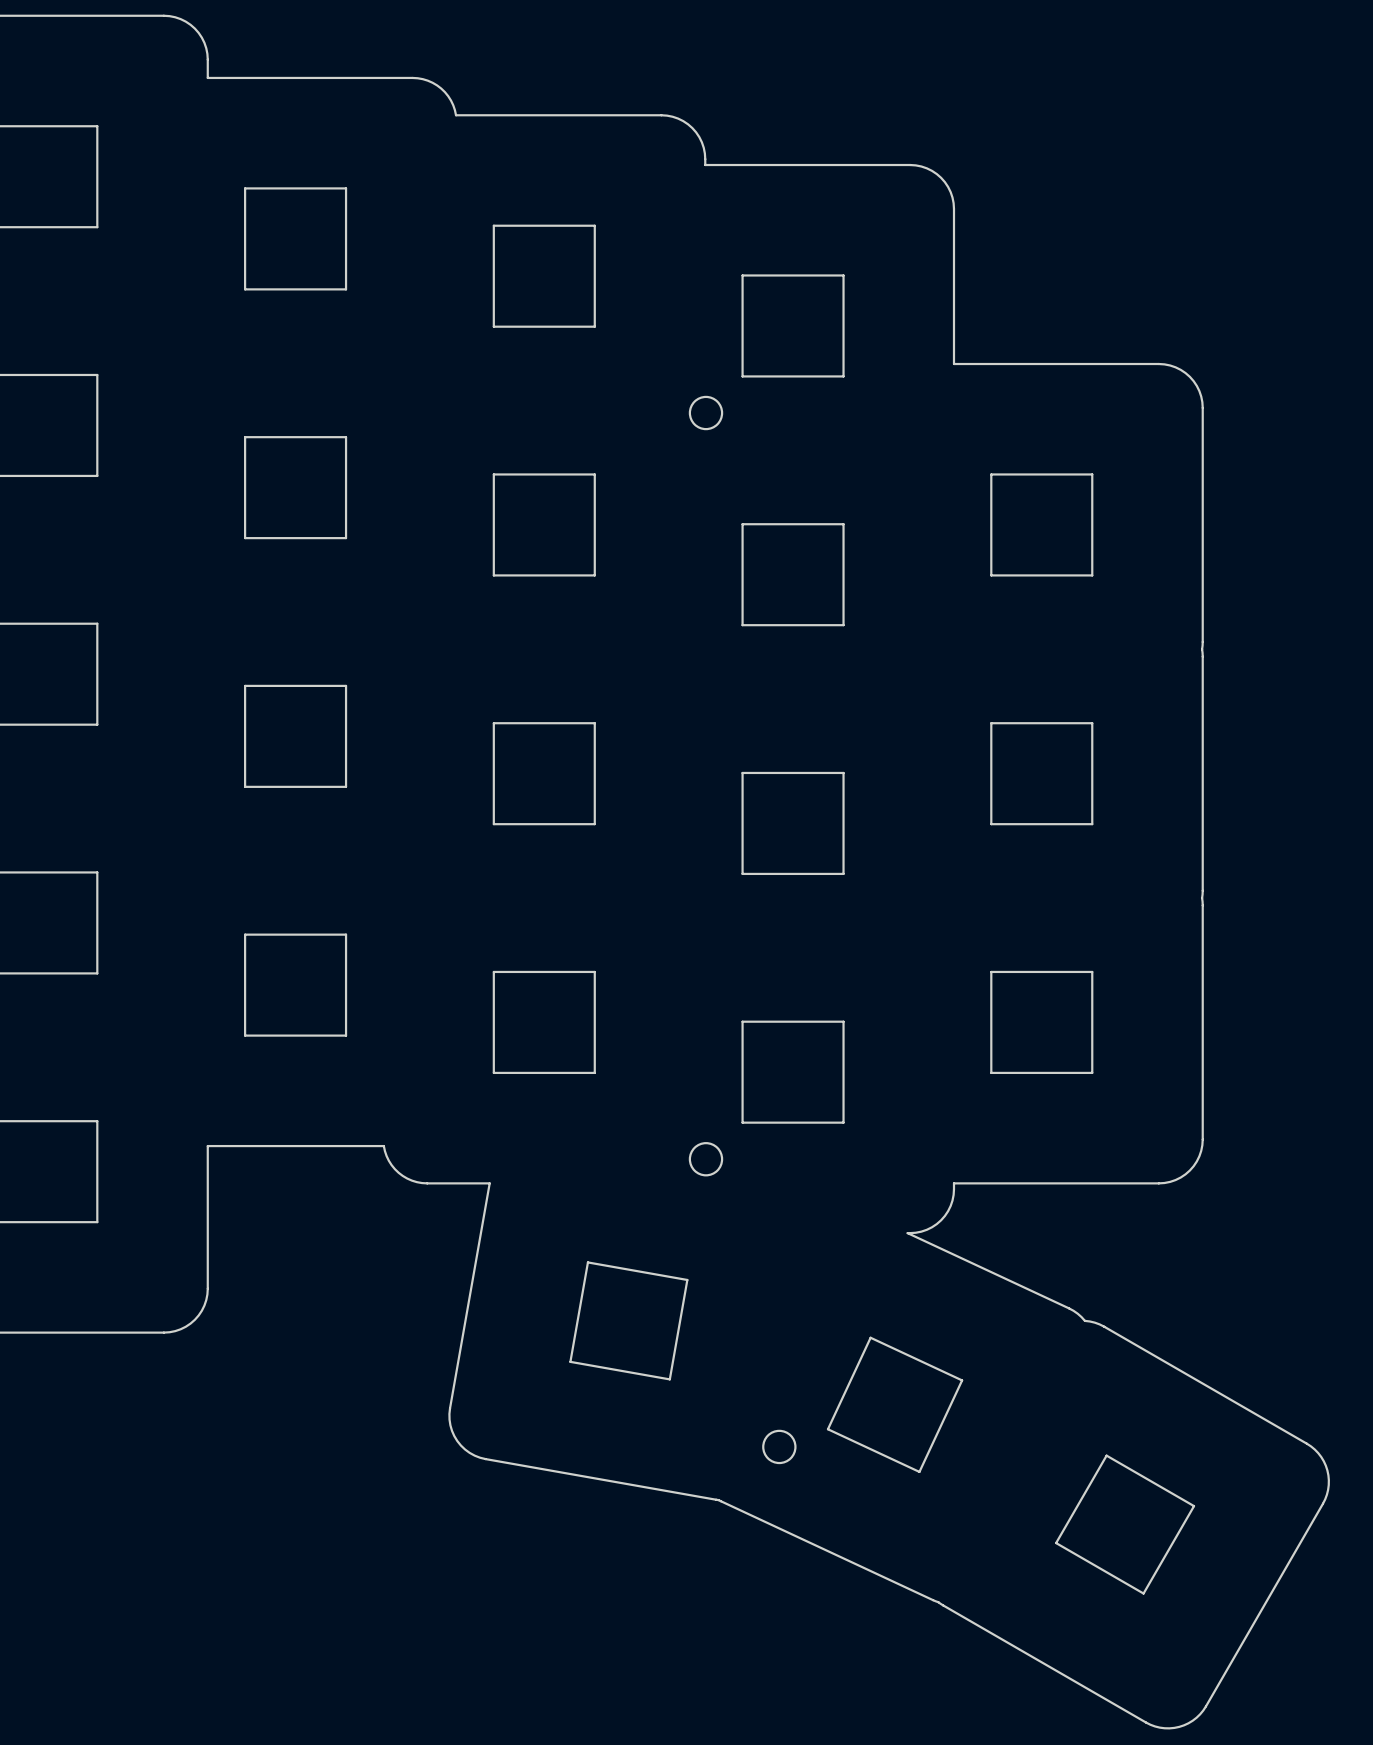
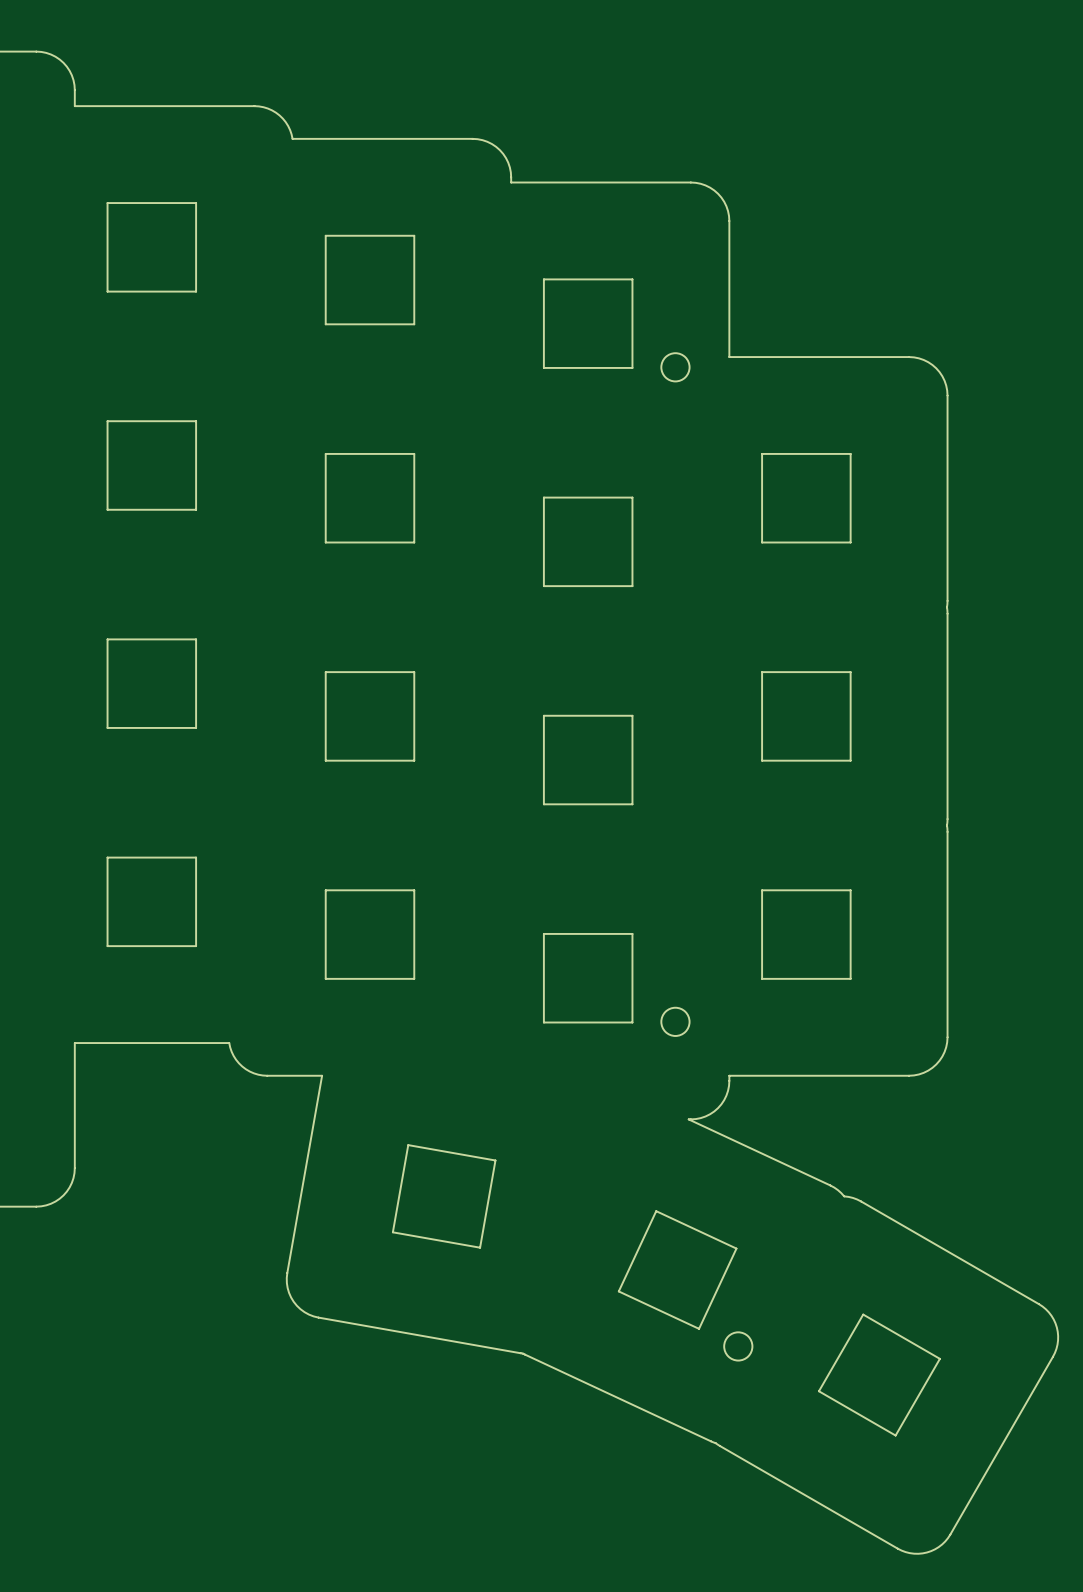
round board edge position: (705, 413) -> (675, 367)
round board edge: none -> [660, 1006, 691, 1037]
round board edge: [688, 1142, 724, 1177] -> none
round board edge: [762, 1429, 797, 1465] -> none
round board edge: none -> [723, 1331, 754, 1362]

